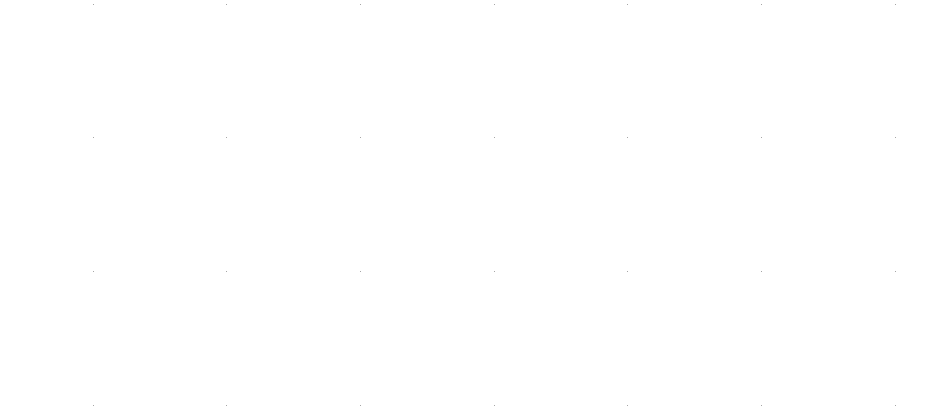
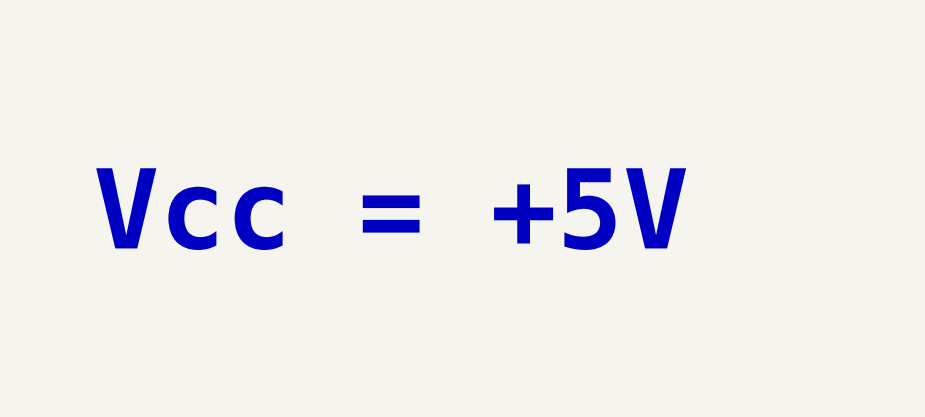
text: none -> Vcc = +5V (391, 209)

